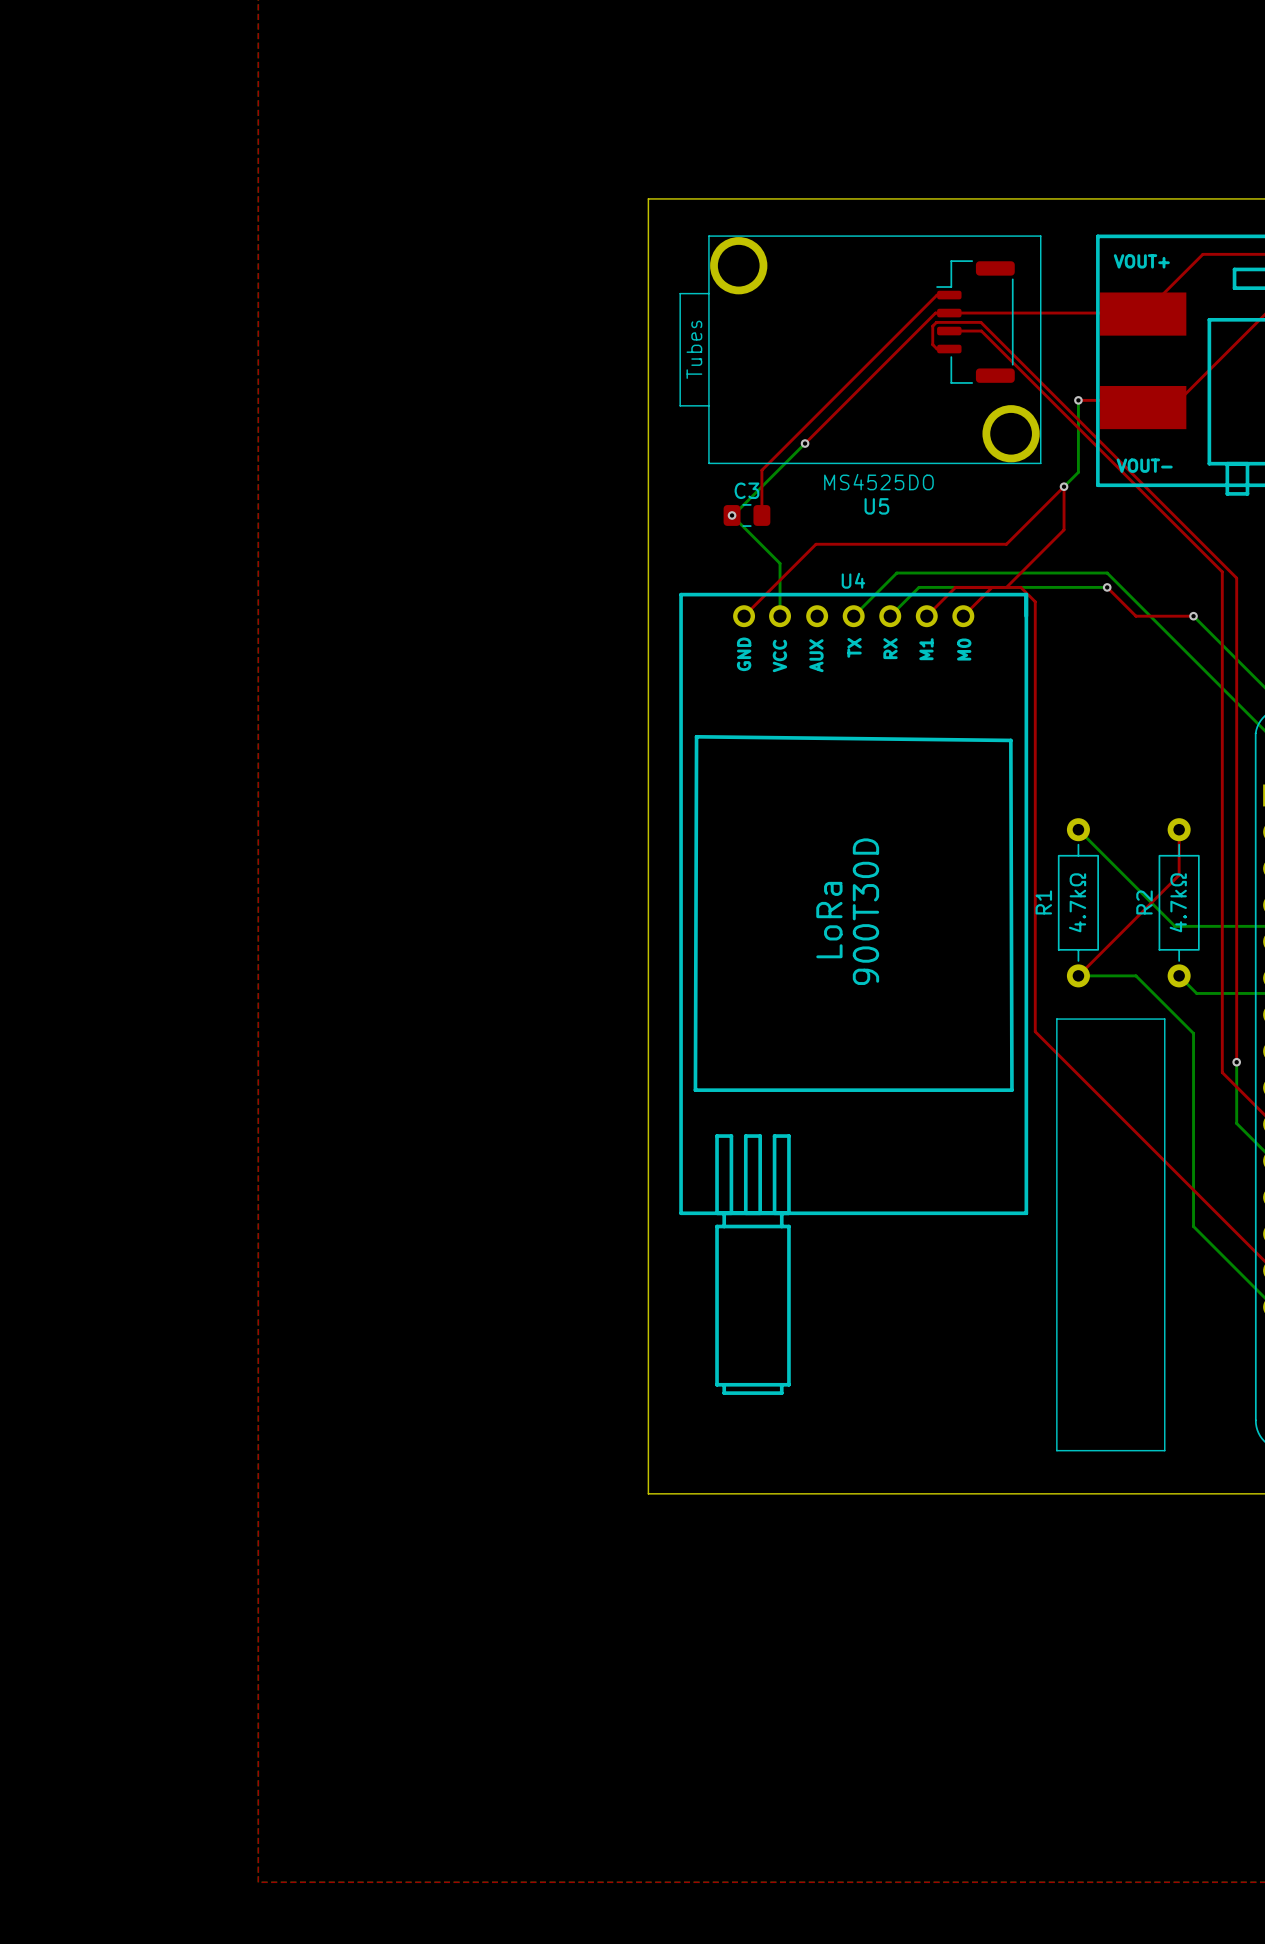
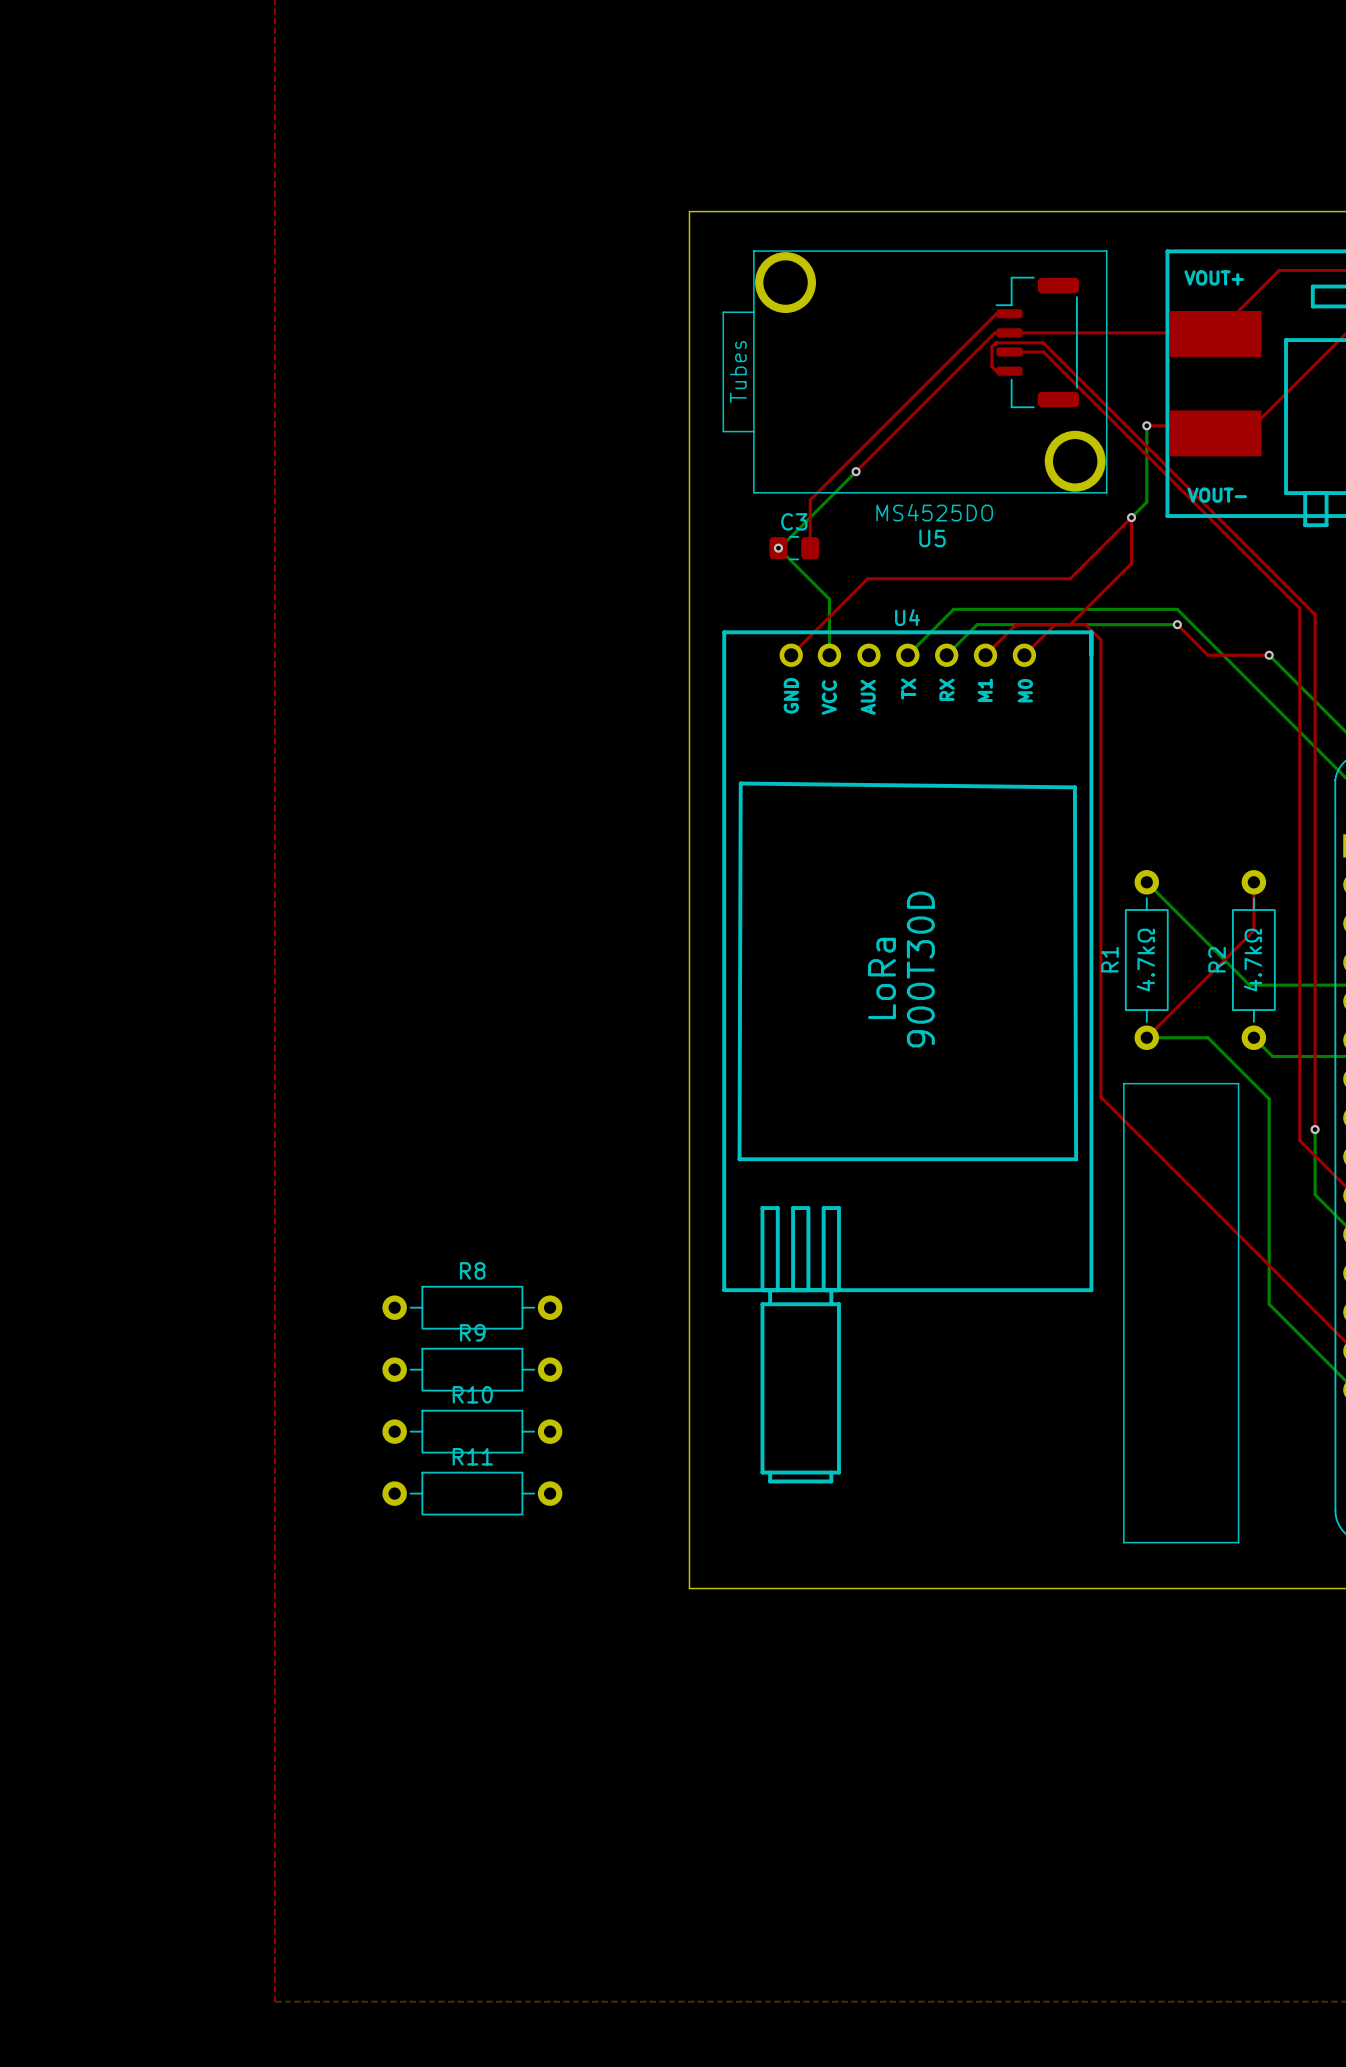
R8: none -> (472, 1307)
R9: none -> (472, 1369)
R10: none -> (472, 1431)
R11: none -> (472, 1493)

